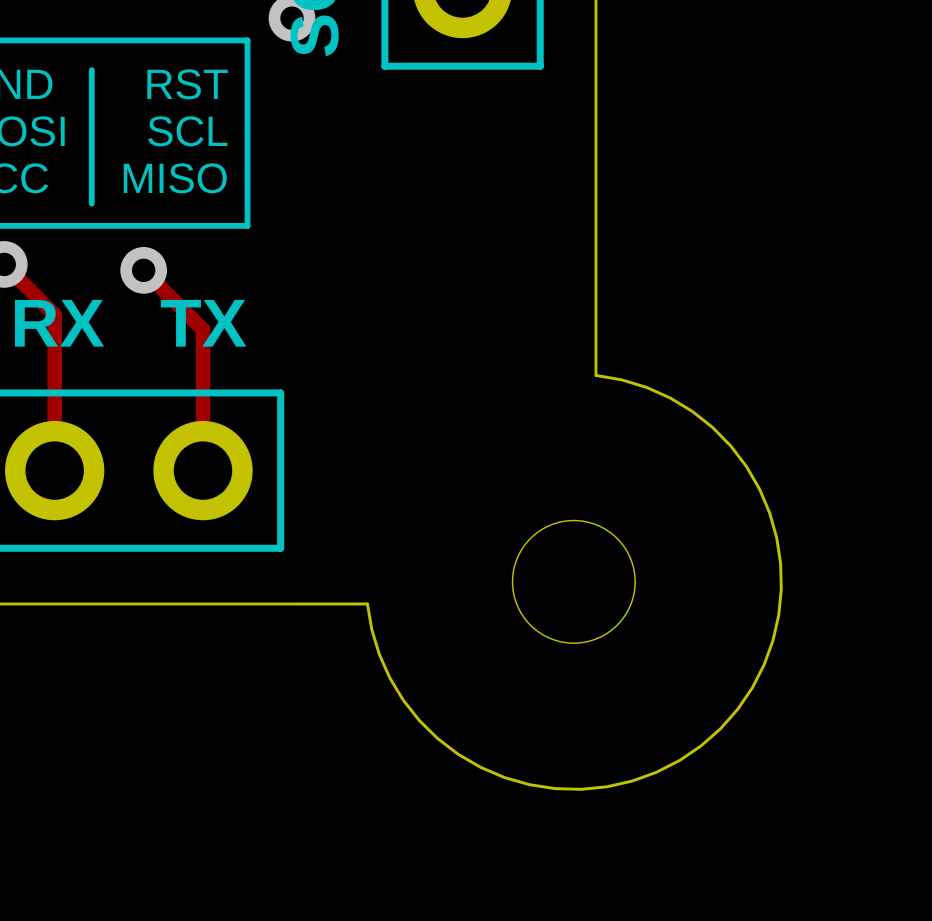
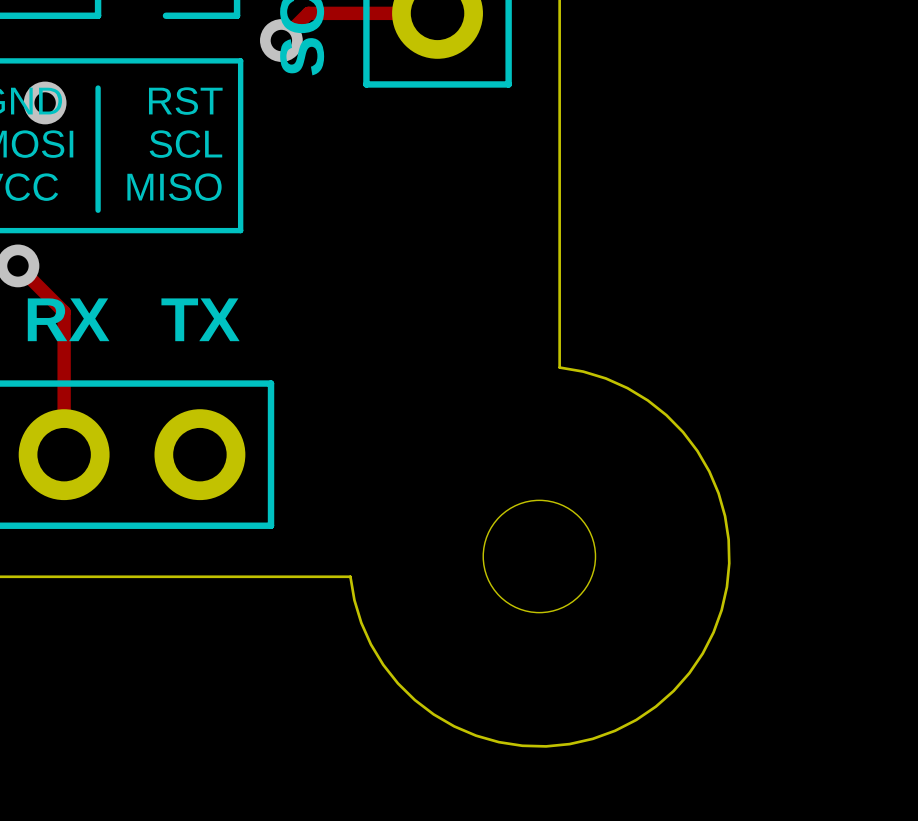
track: (143, 270) (203, 329) (203, 470) -> none
via position: (143, 270) -> (45, 102)

